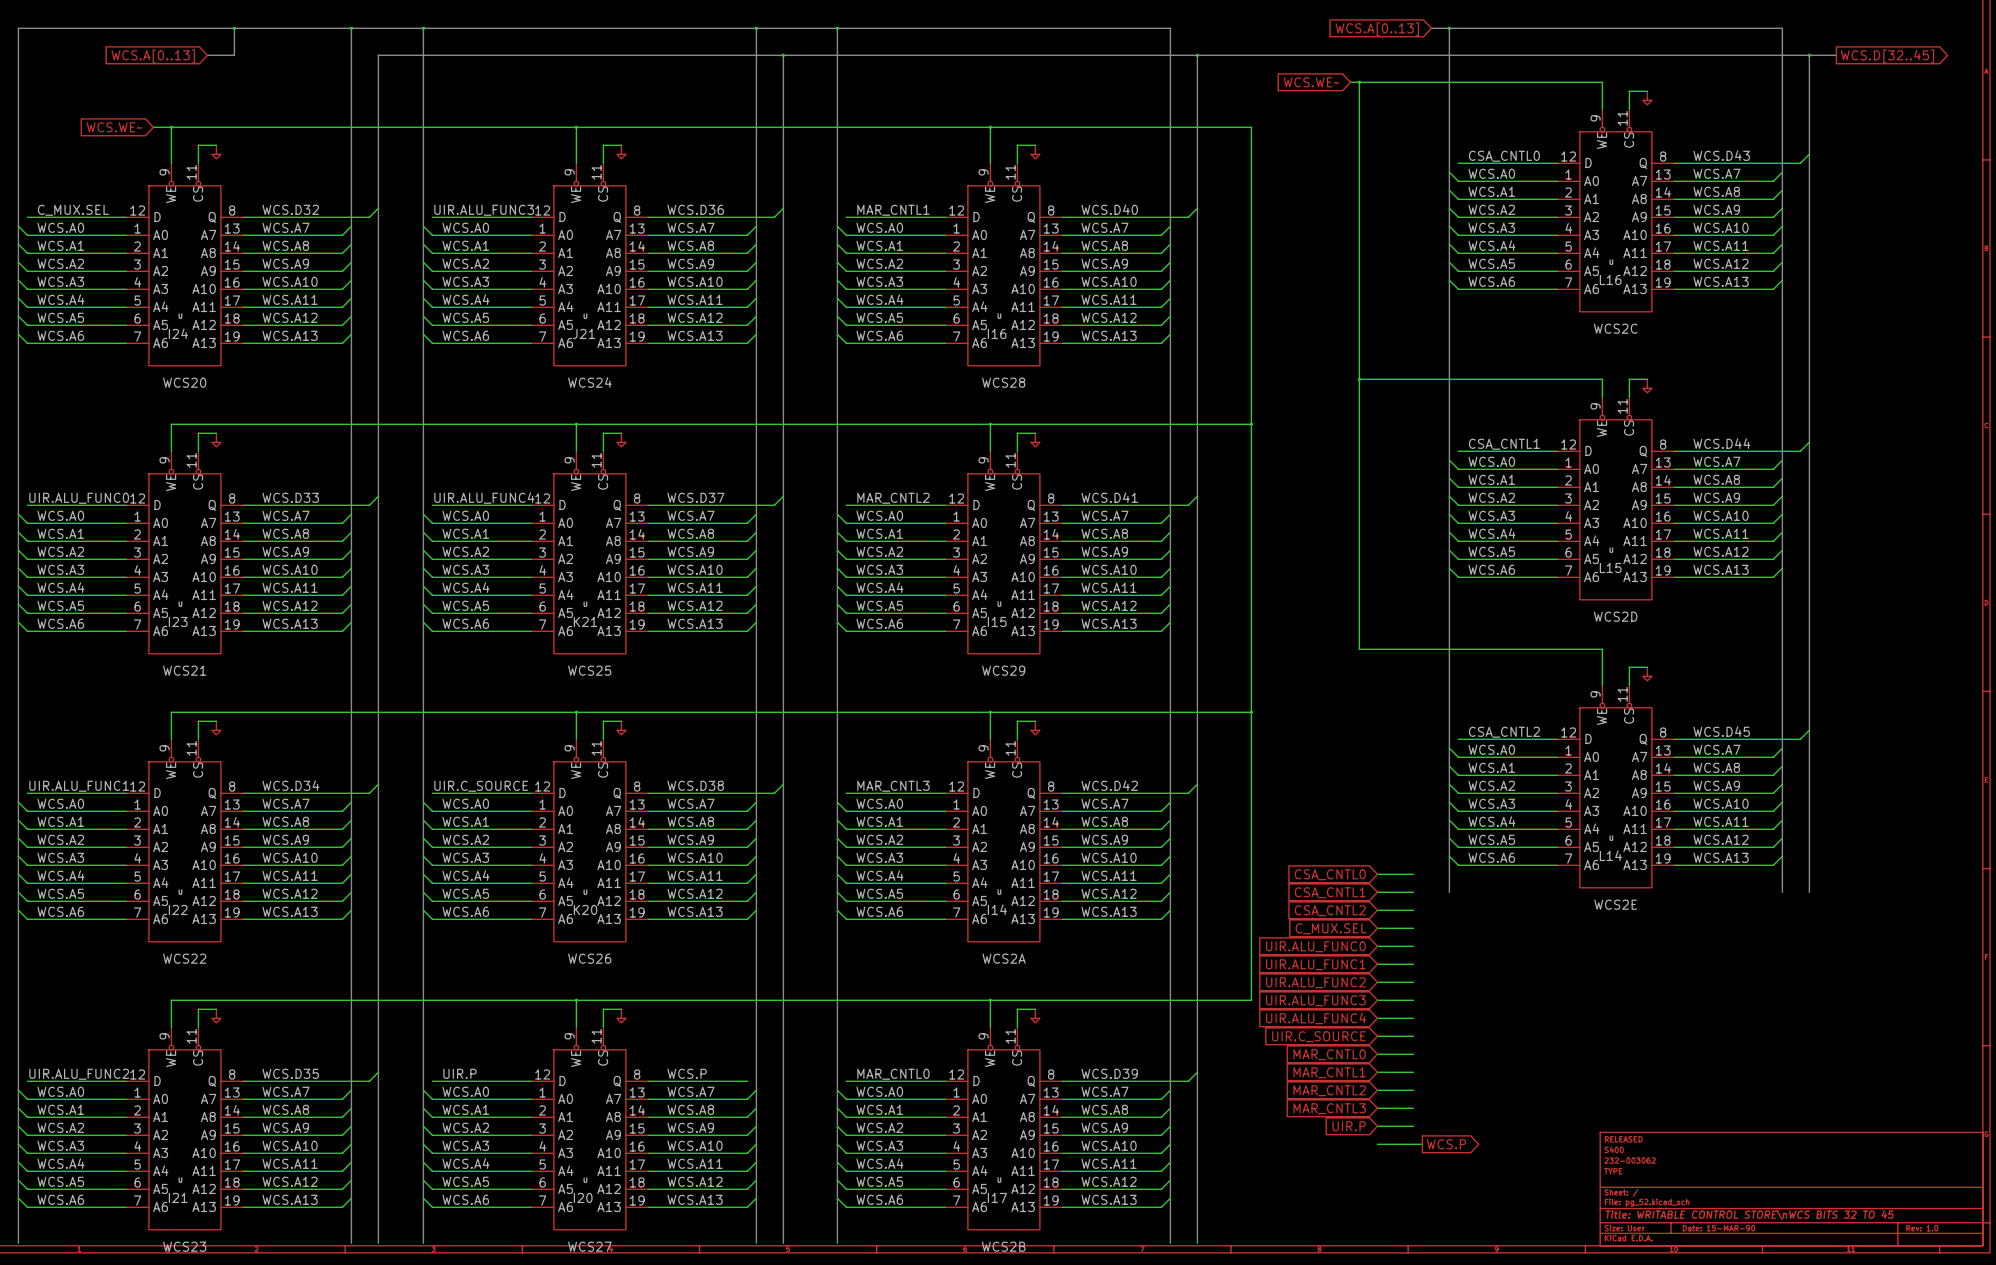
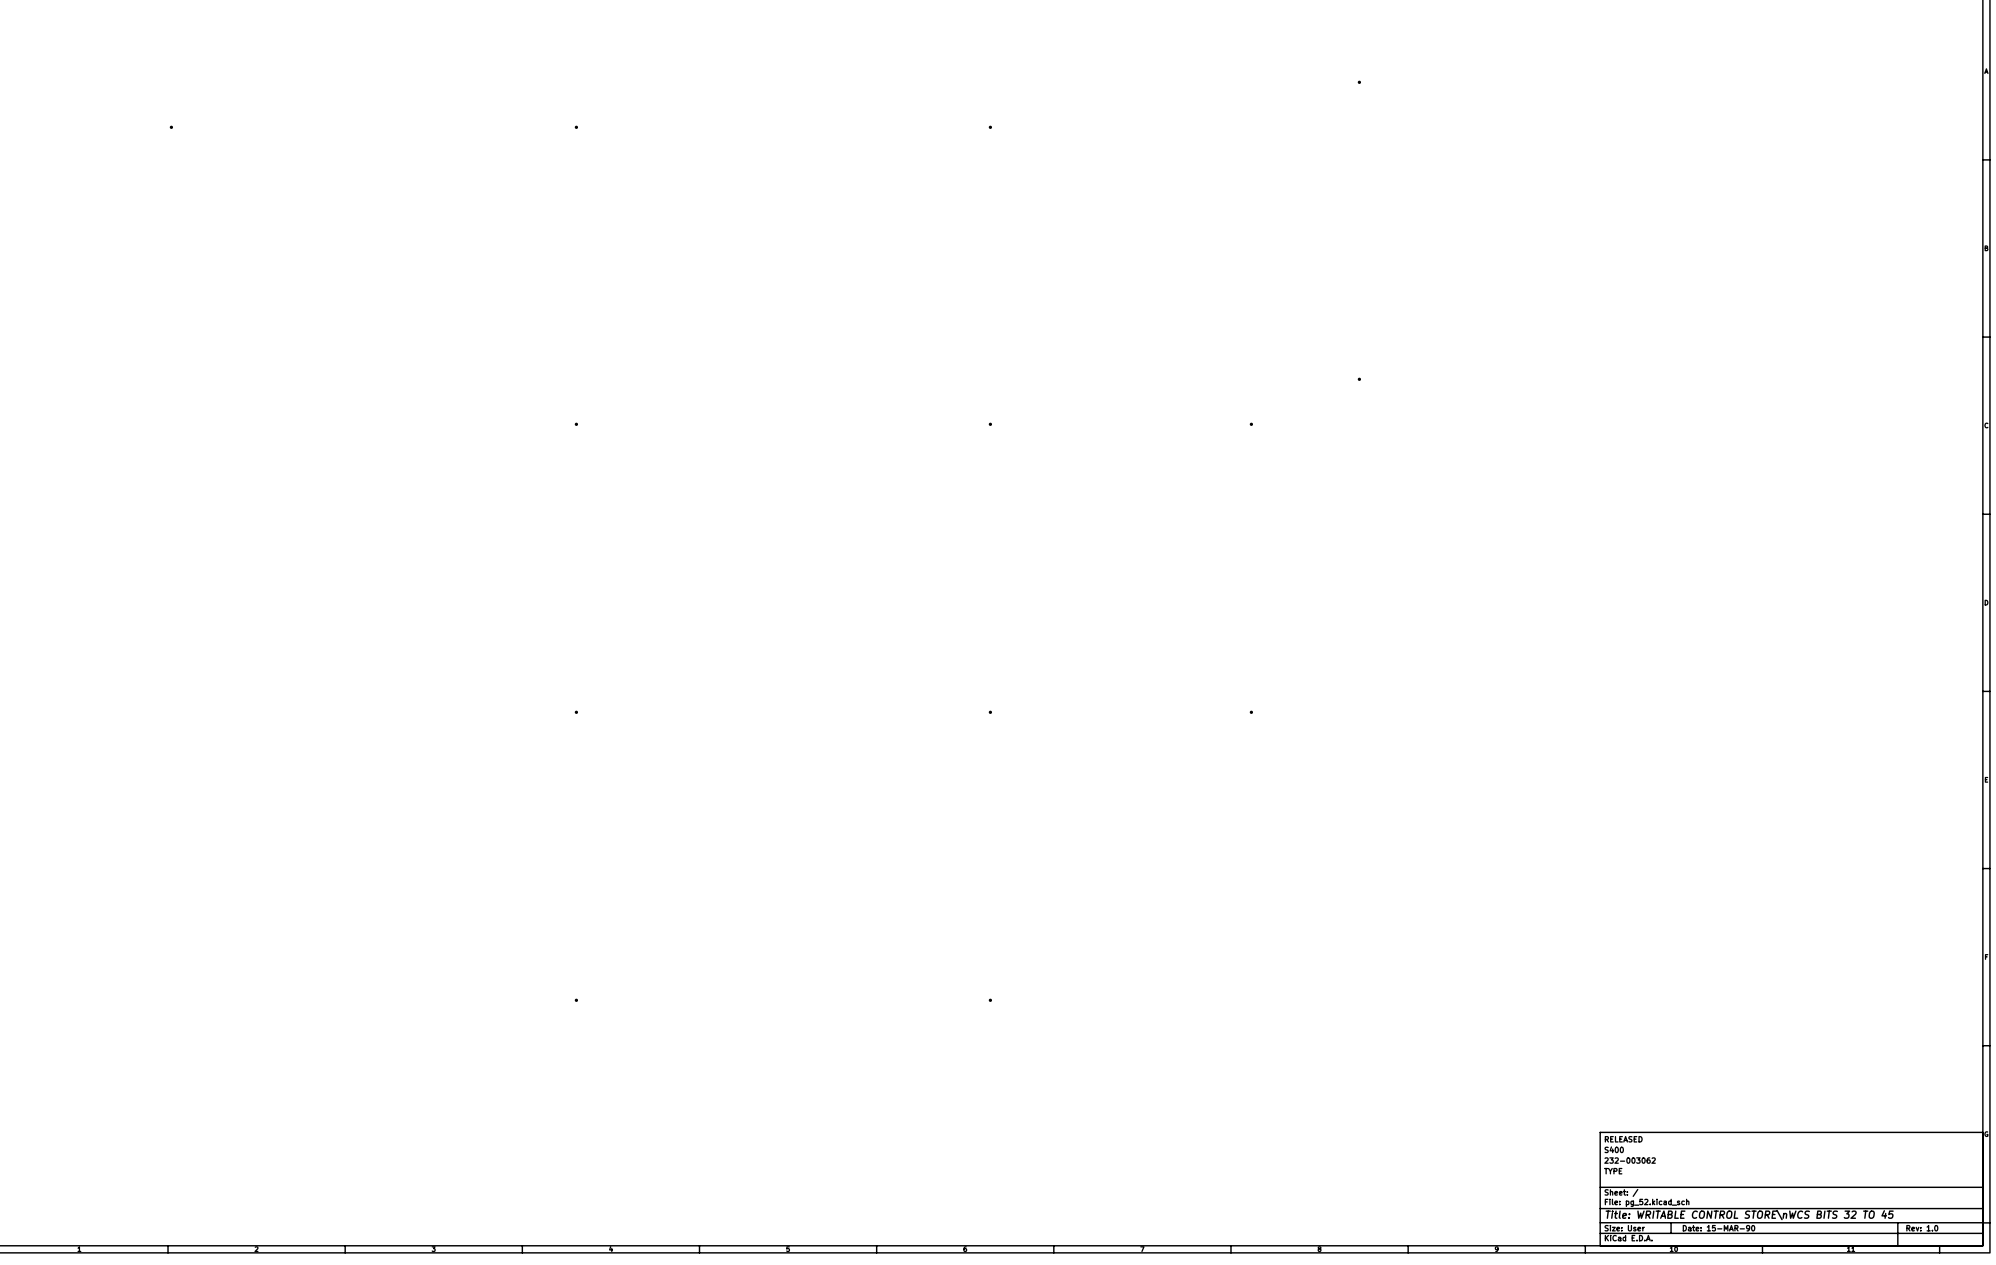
bus: (234, 28) (234, 55) (207, 55) -> none
junction: (234, 28) -> none
bus: (351, 28) (351, 1243) -> none
junction: (351, 28) -> none
bus: (423, 28) (423, 1243) -> none
junction: (423, 28) -> none
bus: (756, 28) (756, 1243) -> none
junction: (756, 28) -> none
bus: (837, 28) (837, 1243) -> none
junction: (837, 28) -> none
bus: (1431, 28) (1782, 28) (1782, 892) -> none
bus: (1449, 28) (1449, 892) -> none
junction: (1449, 28) -> none
global label: WCS.A[0..13] (1377, 29) -> none
bus: (783, 55) (783, 1243) -> none
junction: (783, 55) -> none
bus: (1197, 55) (1197, 1243) -> none
junction: (1197, 55) -> none
bus: (1809, 55) (1809, 892) -> none
junction: (1809, 55) -> none
bus: (1836, 55) (378, 55) (378, 1243) -> none
global label: WCS.A[0..13] (153, 56) -> none
global label: WCS.D[32..45] (1887, 56) -> none
global label: WCS.WE~ (1311, 82) -> none
wire: (1350, 82) (1602, 82) (1602, 109) -> none
wire: (1359, 82) (1359, 649) (1602, 649) (1602, 685) -> none
wire: (1647, 91) (1629, 91) (1629, 109) -> none
power symbol: (1647, 98) -> none
global label: WCS.WE~ (114, 127) -> none
wire: (153, 127) (1251, 127) (1251, 1000) (171, 1000) (171, 1027) -> none
wire: (171, 127) (171, 163) -> none
wire: (576, 127) (576, 163) -> none
wire: (990, 127) (990, 163) -> none
wire: (216, 145) (198, 145) (198, 163) -> none
wire: (621, 145) (603, 145) (603, 163) -> none
wire: (1035, 145) (1017, 145) (1017, 163) -> none
power symbol: (216, 152) -> none
power symbol: (621, 152) -> none
power symbol: (1035, 152) -> none
wire: (1809, 154) (1800, 163) (1674, 163) -> none
label: WCS.D43 (1721, 155) -> none
label: CSA_CNTL0 (1504, 156) -> none
wire: (1458, 163) (1557, 163) -> none
wire: (1449, 172) (1458, 181) (1557, 181) -> none
wire: (1782, 172) (1773, 181) (1674, 181) -> none
label: WCS.A0 (1491, 173) -> none
label: WCS.A7 (1716, 173) -> none
wire: (1449, 190) (1458, 199) (1557, 199) -> none
wire: (1782, 190) (1773, 199) (1674, 199) -> none
label: WCS.A1 (1491, 191) -> none
label: WCS.A8 (1716, 191) -> none
wire: (378, 208) (369, 217) (243, 217) -> none
wire: (783, 208) (774, 217) (648, 217) -> none
wire: (1197, 208) (1188, 217) (1062, 217) -> none
wire: (1449, 208) (1458, 217) (1557, 217) -> none
wire: (1782, 208) (1773, 217) (1674, 217) -> none
label: WCS.D32 (290, 209) -> none
label: WCS.D36 (695, 209) -> none
label: WCS.D40 (1109, 209) -> none
label: WCS.A2 (1491, 209) -> none
label: WCS.A9 (1716, 209) -> none
label: C_MUX.SEL (73, 210) -> none
label: UIR.ALU_FUNC3 (484, 210) -> none
label: MAR_CNTL1 (893, 210) -> none
part: (1615, 210) -> none
wire: (27, 217) (126, 217) -> none
wire: (432, 217) (531, 217) -> none
wire: (846, 217) (945, 217) -> none
wire: (18, 226) (27, 235) (126, 235) -> none
wire: (351, 226) (342, 235) (243, 235) -> none
wire: (423, 226) (432, 235) (531, 235) -> none
wire: (756, 226) (747, 235) (648, 235) -> none
wire: (837, 226) (846, 235) (945, 235) -> none
wire: (1170, 226) (1161, 235) (1062, 235) -> none
wire: (1449, 226) (1458, 235) (1557, 235) -> none
wire: (1782, 226) (1773, 235) (1674, 235) -> none
label: WCS.A0 (60, 227) -> none
label: WCS.A7 (285, 227) -> none
label: WCS.A0 (465, 227) -> none
label: WCS.A7 (690, 227) -> none
label: WCS.A0 (879, 227) -> none
label: WCS.A7 (1104, 227) -> none
label: WCS.A3 (1491, 227) -> none
label: WCS.A10 (1721, 227) -> none
wire: (18, 244) (27, 253) (126, 253) -> none
wire: (351, 244) (342, 253) (243, 253) -> none
wire: (423, 244) (432, 253) (531, 253) -> none
wire: (756, 244) (747, 253) (648, 253) -> none
wire: (837, 244) (846, 253) (945, 253) -> none
wire: (1170, 244) (1161, 253) (1062, 253) -> none
wire: (1449, 244) (1458, 253) (1557, 253) -> none
wire: (1782, 244) (1773, 253) (1674, 253) -> none
label: WCS.A1 (60, 245) -> none
label: WCS.A8 (285, 245) -> none
label: WCS.A1 (465, 245) -> none
label: WCS.A8 (690, 245) -> none
label: WCS.A1 (879, 245) -> none
label: WCS.A8 (1104, 245) -> none
label: WCS.A4 (1491, 245) -> none
label: WCS.A11 (1721, 245) -> none
wire: (18, 262) (27, 271) (126, 271) -> none
wire: (351, 262) (342, 271) (243, 271) -> none
wire: (423, 262) (432, 271) (531, 271) -> none
wire: (756, 262) (747, 271) (648, 271) -> none
wire: (837, 262) (846, 271) (945, 271) -> none
wire: (1170, 262) (1161, 271) (1062, 271) -> none
wire: (1449, 262) (1458, 271) (1557, 271) -> none
wire: (1782, 262) (1773, 271) (1674, 271) -> none
label: WCS.A2 (60, 263) -> none
label: WCS.A9 (285, 263) -> none
label: WCS.A2 (465, 263) -> none
label: WCS.A9 (690, 263) -> none
label: WCS.A2 (879, 263) -> none
label: WCS.A9 (1104, 263) -> none
label: WCS.A5 (1491, 263) -> none
label: WCS.A12 (1721, 263) -> none
part: (184, 264) -> none
part: (589, 264) -> none
part: (1003, 264) -> none
wire: (18, 280) (27, 289) (126, 289) -> none
wire: (351, 280) (342, 289) (243, 289) -> none
wire: (423, 280) (432, 289) (531, 289) -> none
wire: (756, 280) (747, 289) (648, 289) -> none
wire: (837, 280) (846, 289) (945, 289) -> none
wire: (1170, 280) (1161, 289) (1062, 289) -> none
wire: (1449, 280) (1458, 289) (1557, 289) -> none
wire: (1782, 280) (1773, 289) (1674, 289) -> none
label: WCS.A3 (60, 281) -> none
label: WCS.A10 (290, 281) -> none
label: WCS.A3 (465, 281) -> none
label: WCS.A10 (695, 281) -> none
label: WCS.A3 (879, 281) -> none
label: WCS.A10 (1109, 281) -> none
label: WCS.A6 (1491, 281) -> none
label: WCS.A13 (1721, 281) -> none
wire: (18, 298) (27, 307) (126, 307) -> none
wire: (351, 298) (342, 307) (243, 307) -> none
wire: (423, 298) (432, 307) (531, 307) -> none
wire: (756, 298) (747, 307) (648, 307) -> none
wire: (837, 298) (846, 307) (945, 307) -> none
wire: (1170, 298) (1161, 307) (1062, 307) -> none
label: WCS.A4 (60, 299) -> none
label: WCS.A11 (290, 299) -> none
label: WCS.A4 (465, 299) -> none
label: WCS.A11 (695, 299) -> none
label: WCS.A4 (879, 299) -> none
label: WCS.A11 (1109, 299) -> none
wire: (18, 316) (27, 325) (126, 325) -> none
wire: (351, 316) (342, 325) (243, 325) -> none
wire: (423, 316) (432, 325) (531, 325) -> none
wire: (756, 316) (747, 325) (648, 325) -> none
wire: (837, 316) (846, 325) (945, 325) -> none
wire: (1170, 316) (1161, 325) (1062, 325) -> none
label: WCS.A5 (60, 317) -> none
label: WCS.A12 (290, 317) -> none
label: WCS.A5 (465, 317) -> none
label: WCS.A12 (695, 317) -> none
label: WCS.A5 (879, 317) -> none
label: WCS.A12 (1109, 317) -> none
wire: (18, 334) (27, 343) (126, 343) -> none
wire: (351, 334) (342, 343) (243, 343) -> none
wire: (423, 334) (432, 343) (531, 343) -> none
wire: (756, 334) (747, 343) (648, 343) -> none
wire: (837, 334) (846, 343) (945, 343) -> none
wire: (1170, 334) (1161, 343) (1062, 343) -> none
label: WCS.A6 (60, 335) -> none
label: WCS.A13 (290, 335) -> none
label: WCS.A6 (465, 335) -> none
label: WCS.A13 (695, 335) -> none
label: WCS.A6 (879, 335) -> none
label: WCS.A13 (1109, 335) -> none
wire: (1359, 379) (1602, 379) (1602, 397) -> none
wire: (1647, 379) (1629, 379) (1629, 397) -> none
power symbol: (1647, 386) -> none
wire: (576, 424) (576, 451) -> none
wire: (990, 424) (990, 451) -> none
wire: (1251, 424) (171, 424) (171, 451) -> none
wire: (216, 433) (198, 433) (198, 451) -> none
wire: (621, 433) (603, 433) (603, 451) -> none
wire: (1035, 433) (1017, 433) (1017, 451) -> none
power symbol: (216, 440) -> none
power symbol: (621, 440) -> none
power symbol: (1035, 440) -> none
wire: (1809, 442) (1800, 451) (1674, 451) -> none
label: WCS.D44 (1721, 443) -> none
label: CSA_CNTL1 (1504, 444) -> none
wire: (1458, 451) (1557, 451) -> none
wire: (1449, 460) (1458, 469) (1557, 469) -> none
wire: (1782, 460) (1773, 469) (1674, 469) -> none
label: WCS.A0 (1491, 461) -> none
label: WCS.A7 (1716, 461) -> none
wire: (1449, 478) (1458, 487) (1557, 487) -> none
wire: (1782, 478) (1773, 487) (1674, 487) -> none
label: WCS.A1 (1491, 479) -> none
label: WCS.A8 (1716, 479) -> none
wire: (378, 496) (369, 505) (243, 505) -> none
wire: (783, 496) (774, 505) (648, 505) -> none
wire: (1197, 496) (1188, 505) (1062, 505) -> none
wire: (1449, 496) (1458, 505) (1557, 505) -> none
wire: (1782, 496) (1773, 505) (1674, 505) -> none
label: WCS.D33 (290, 497) -> none
label: WCS.D37 (695, 497) -> none
label: WCS.D41 (1109, 497) -> none
label: WCS.A2 (1491, 497) -> none
label: WCS.A9 (1716, 497) -> none
label: UIR.ALU_FUNC0 (79, 498) -> none
label: UIR.ALU_FUNC4 (484, 498) -> none
label: MAR_CNTL2 (893, 498) -> none
part: (1615, 498) -> none
wire: (27, 505) (126, 505) -> none
wire: (432, 505) (531, 505) -> none
wire: (846, 505) (945, 505) -> none
wire: (18, 514) (27, 523) (126, 523) -> none
wire: (351, 514) (342, 523) (243, 523) -> none
wire: (423, 514) (432, 523) (531, 523) -> none
wire: (756, 514) (747, 523) (648, 523) -> none
wire: (837, 514) (846, 523) (945, 523) -> none
wire: (1170, 514) (1161, 523) (1062, 523) -> none
wire: (1449, 514) (1458, 523) (1557, 523) -> none
wire: (1782, 514) (1773, 523) (1674, 523) -> none
label: WCS.A0 (60, 515) -> none
label: WCS.A7 (285, 515) -> none
label: WCS.A0 (465, 515) -> none
label: WCS.A7 (690, 515) -> none
label: WCS.A0 (879, 515) -> none
label: WCS.A7 (1104, 515) -> none
label: WCS.A3 (1491, 515) -> none
label: WCS.A10 (1721, 515) -> none
wire: (18, 532) (27, 541) (126, 541) -> none
wire: (351, 532) (342, 541) (243, 541) -> none
wire: (423, 532) (432, 541) (531, 541) -> none
wire: (756, 532) (747, 541) (648, 541) -> none
wire: (837, 532) (846, 541) (945, 541) -> none
wire: (1170, 532) (1161, 541) (1062, 541) -> none
wire: (1449, 532) (1458, 541) (1557, 541) -> none
wire: (1782, 532) (1773, 541) (1674, 541) -> none
label: WCS.A1 (60, 533) -> none
label: WCS.A8 (285, 533) -> none
label: WCS.A1 (465, 533) -> none
label: WCS.A8 (690, 533) -> none
label: WCS.A1 (879, 533) -> none
label: WCS.A8 (1104, 533) -> none
label: WCS.A4 (1491, 533) -> none
label: WCS.A11 (1721, 533) -> none
wire: (18, 550) (27, 559) (126, 559) -> none
wire: (351, 550) (342, 559) (243, 559) -> none
wire: (423, 550) (432, 559) (531, 559) -> none
wire: (756, 550) (747, 559) (648, 559) -> none
wire: (837, 550) (846, 559) (945, 559) -> none
wire: (1170, 550) (1161, 559) (1062, 559) -> none
wire: (1449, 550) (1458, 559) (1557, 559) -> none
wire: (1782, 550) (1773, 559) (1674, 559) -> none
label: WCS.A2 (60, 551) -> none
label: WCS.A9 (285, 551) -> none
label: WCS.A2 (465, 551) -> none
label: WCS.A9 (690, 551) -> none
label: WCS.A2 (879, 551) -> none
label: WCS.A9 (1104, 551) -> none
label: WCS.A5 (1491, 551) -> none
label: WCS.A12 (1721, 551) -> none
part: (184, 552) -> none
part: (589, 552) -> none
part: (1003, 552) -> none
wire: (18, 568) (27, 577) (126, 577) -> none
wire: (351, 568) (342, 577) (243, 577) -> none
wire: (423, 568) (432, 577) (531, 577) -> none
wire: (756, 568) (747, 577) (648, 577) -> none
wire: (837, 568) (846, 577) (945, 577) -> none
wire: (1170, 568) (1161, 577) (1062, 577) -> none
wire: (1449, 568) (1458, 577) (1557, 577) -> none
wire: (1782, 568) (1773, 577) (1674, 577) -> none
label: WCS.A3 (60, 569) -> none
label: WCS.A10 (290, 569) -> none
label: WCS.A3 (465, 569) -> none
label: WCS.A10 (695, 569) -> none
label: WCS.A3 (879, 569) -> none
label: WCS.A10 (1109, 569) -> none
label: WCS.A6 (1491, 569) -> none
label: WCS.A13 (1721, 569) -> none
wire: (18, 586) (27, 595) (126, 595) -> none
wire: (351, 586) (342, 595) (243, 595) -> none
wire: (423, 586) (432, 595) (531, 595) -> none
wire: (756, 586) (747, 595) (648, 595) -> none
wire: (837, 586) (846, 595) (945, 595) -> none
wire: (1170, 586) (1161, 595) (1062, 595) -> none
label: WCS.A4 (60, 587) -> none
label: WCS.A11 (290, 587) -> none
label: WCS.A4 (465, 587) -> none
label: WCS.A11 (695, 587) -> none
label: WCS.A4 (879, 587) -> none
label: WCS.A11 (1109, 587) -> none
wire: (18, 604) (27, 613) (126, 613) -> none
wire: (351, 604) (342, 613) (243, 613) -> none
wire: (423, 604) (432, 613) (531, 613) -> none
wire: (756, 604) (747, 613) (648, 613) -> none
wire: (837, 604) (846, 613) (945, 613) -> none
wire: (1170, 604) (1161, 613) (1062, 613) -> none
label: WCS.A5 (60, 605) -> none
label: WCS.A12 (290, 605) -> none
label: WCS.A5 (465, 605) -> none
label: WCS.A12 (695, 605) -> none
label: WCS.A5 (879, 605) -> none
label: WCS.A12 (1109, 605) -> none
wire: (18, 622) (27, 631) (126, 631) -> none
wire: (351, 622) (342, 631) (243, 631) -> none
wire: (423, 622) (432, 631) (531, 631) -> none
wire: (756, 622) (747, 631) (648, 631) -> none
wire: (837, 622) (846, 631) (945, 631) -> none
wire: (1170, 622) (1161, 631) (1062, 631) -> none
label: WCS.A6 (60, 623) -> none
label: WCS.A13 (290, 623) -> none
label: WCS.A6 (465, 623) -> none
label: WCS.A13 (695, 623) -> none
label: WCS.A6 (879, 623) -> none
label: WCS.A13 (1109, 623) -> none
wire: (1647, 667) (1629, 667) (1629, 685) -> none
power symbol: (1647, 674) -> none
wire: (576, 712) (576, 739) -> none
wire: (990, 712) (990, 739) -> none
wire: (1251, 712) (171, 712) (171, 739) -> none
wire: (216, 721) (198, 721) (198, 739) -> none
wire: (621, 721) (603, 721) (603, 739) -> none
wire: (1035, 721) (1017, 721) (1017, 739) -> none
power symbol: (216, 728) -> none
power symbol: (621, 728) -> none
power symbol: (1035, 728) -> none
wire: (1809, 730) (1800, 739) (1674, 739) -> none
label: WCS.D45 (1721, 731) -> none
label: CSA_CNTL2 (1504, 732) -> none
wire: (1458, 739) (1557, 739) -> none
wire: (1449, 748) (1458, 757) (1557, 757) -> none
wire: (1782, 748) (1773, 757) (1674, 757) -> none
label: WCS.A0 (1491, 749) -> none
label: WCS.A7 (1716, 749) -> none
wire: (1449, 766) (1458, 775) (1557, 775) -> none
wire: (1782, 766) (1773, 775) (1674, 775) -> none
label: WCS.A1 (1491, 767) -> none
label: WCS.A8 (1716, 767) -> none
wire: (378, 784) (369, 793) (243, 793) -> none
wire: (783, 784) (774, 793) (648, 793) -> none
wire: (1197, 784) (1188, 793) (1062, 793) -> none
wire: (1449, 784) (1458, 793) (1557, 793) -> none
wire: (1782, 784) (1773, 793) (1674, 793) -> none
label: WCS.D34 (290, 785) -> none
label: WCS.D38 (695, 785) -> none
label: WCS.D42 (1109, 785) -> none
label: WCS.A2 (1491, 785) -> none
label: WCS.A9 (1716, 785) -> none
label: UIR.ALU_FUNC1 (79, 786) -> none
label: UIR.C_SOURCE (481, 786) -> none
label: MAR_CNTL3 (893, 786) -> none
part: (1615, 786) -> none
wire: (27, 793) (126, 793) -> none
wire: (432, 793) (531, 793) -> none
wire: (846, 793) (945, 793) -> none
wire: (18, 802) (27, 811) (126, 811) -> none
wire: (351, 802) (342, 811) (243, 811) -> none
wire: (423, 802) (432, 811) (531, 811) -> none
wire: (756, 802) (747, 811) (648, 811) -> none
wire: (837, 802) (846, 811) (945, 811) -> none
wire: (1170, 802) (1161, 811) (1062, 811) -> none
wire: (1449, 802) (1458, 811) (1557, 811) -> none
wire: (1782, 802) (1773, 811) (1674, 811) -> none
label: WCS.A0 (60, 803) -> none
label: WCS.A7 (285, 803) -> none
label: WCS.A0 (465, 803) -> none
label: WCS.A7 (690, 803) -> none
label: WCS.A0 (879, 803) -> none
label: WCS.A7 (1104, 803) -> none
label: WCS.A3 (1491, 803) -> none
label: WCS.A10 (1721, 803) -> none
wire: (18, 820) (27, 829) (126, 829) -> none
wire: (351, 820) (342, 829) (243, 829) -> none
wire: (423, 820) (432, 829) (531, 829) -> none
wire: (756, 820) (747, 829) (648, 829) -> none
wire: (837, 820) (846, 829) (945, 829) -> none
wire: (1170, 820) (1161, 829) (1062, 829) -> none
wire: (1449, 820) (1458, 829) (1557, 829) -> none
wire: (1782, 820) (1773, 829) (1674, 829) -> none
label: WCS.A1 (60, 821) -> none
label: WCS.A8 (285, 821) -> none
label: WCS.A1 (465, 821) -> none
label: WCS.A8 (690, 821) -> none
label: WCS.A1 (879, 821) -> none
label: WCS.A8 (1104, 821) -> none
label: WCS.A4 (1491, 821) -> none
label: WCS.A11 (1721, 821) -> none
wire: (18, 838) (27, 847) (126, 847) -> none
wire: (351, 838) (342, 847) (243, 847) -> none
wire: (423, 838) (432, 847) (531, 847) -> none
wire: (756, 838) (747, 847) (648, 847) -> none
wire: (837, 838) (846, 847) (945, 847) -> none
wire: (1170, 838) (1161, 847) (1062, 847) -> none
wire: (1449, 838) (1458, 847) (1557, 847) -> none
wire: (1782, 838) (1773, 847) (1674, 847) -> none
label: WCS.A2 (60, 839) -> none
label: WCS.A9 (285, 839) -> none
label: WCS.A2 (465, 839) -> none
label: WCS.A9 (690, 839) -> none
label: WCS.A2 (879, 839) -> none
label: WCS.A9 (1104, 839) -> none
label: WCS.A5 (1491, 839) -> none
label: WCS.A12 (1721, 839) -> none
part: (184, 840) -> none
part: (589, 840) -> none
part: (1003, 840) -> none
wire: (18, 856) (27, 865) (126, 865) -> none
wire: (351, 856) (342, 865) (243, 865) -> none
wire: (423, 856) (432, 865) (531, 865) -> none
wire: (756, 856) (747, 865) (648, 865) -> none
wire: (837, 856) (846, 865) (945, 865) -> none
wire: (1170, 856) (1161, 865) (1062, 865) -> none
wire: (1449, 856) (1458, 865) (1557, 865) -> none
wire: (1782, 856) (1773, 865) (1674, 865) -> none
label: WCS.A3 (60, 857) -> none
label: WCS.A10 (290, 857) -> none
label: WCS.A3 (465, 857) -> none
label: WCS.A10 (695, 857) -> none
label: WCS.A3 (879, 857) -> none
label: WCS.A10 (1109, 857) -> none
label: WCS.A6 (1491, 857) -> none
label: WCS.A13 (1721, 857) -> none
wire: (18, 874) (27, 883) (126, 883) -> none
wire: (351, 874) (342, 883) (243, 883) -> none
wire: (423, 874) (432, 883) (531, 883) -> none
wire: (756, 874) (747, 883) (648, 883) -> none
wire: (837, 874) (846, 883) (945, 883) -> none
wire: (1170, 874) (1161, 883) (1062, 883) -> none
global label: CSA_CNTL0 (1330, 874) -> none
wire: (1377, 874) (1413, 874) -> none
label: WCS.A4 (60, 875) -> none
label: WCS.A11 (290, 875) -> none
label: WCS.A4 (465, 875) -> none
label: WCS.A11 (695, 875) -> none
label: WCS.A4 (879, 875) -> none
label: WCS.A11 (1109, 875) -> none
wire: (18, 892) (27, 901) (126, 901) -> none
wire: (351, 892) (342, 901) (243, 901) -> none
wire: (423, 892) (432, 901) (531, 901) -> none
wire: (756, 892) (747, 901) (648, 901) -> none
wire: (837, 892) (846, 901) (945, 901) -> none
wire: (1170, 892) (1161, 901) (1062, 901) -> none
global label: CSA_CNTL1 (1330, 892) -> none
wire: (1377, 892) (1413, 892) -> none
label: WCS.A5 (60, 893) -> none
label: WCS.A12 (290, 893) -> none
label: WCS.A5 (465, 893) -> none
label: WCS.A12 (695, 893) -> none
label: WCS.A5 (879, 893) -> none
label: WCS.A12 (1109, 893) -> none
wire: (18, 910) (27, 919) (126, 919) -> none
wire: (351, 910) (342, 919) (243, 919) -> none
wire: (423, 910) (432, 919) (531, 919) -> none
wire: (756, 910) (747, 919) (648, 919) -> none
wire: (837, 910) (846, 919) (945, 919) -> none
wire: (1170, 910) (1161, 919) (1062, 919) -> none
global label: CSA_CNTL2 (1330, 910) -> none
wire: (1377, 910) (1413, 910) -> none
label: WCS.A6 (60, 911) -> none
label: WCS.A13 (290, 911) -> none
label: WCS.A6 (465, 911) -> none
label: WCS.A13 (695, 911) -> none
label: WCS.A6 (879, 911) -> none
label: WCS.A13 (1109, 911) -> none
global label: C_MUX.SEL (1331, 928) -> none
wire: (1377, 928) (1413, 928) -> none
global label: UIR.ALU_FUNC0 (1315, 946) -> none
wire: (1377, 946) (1413, 946) -> none
global label: UIR.ALU_FUNC1 (1315, 964) -> none
wire: (1377, 964) (1413, 964) -> none
global label: UIR.ALU_FUNC2 (1315, 982) -> none
wire: (1377, 982) (1413, 982) -> none
wire: (576, 1000) (576, 1027) -> none
wire: (990, 1000) (990, 1027) -> none
global label: UIR.ALU_FUNC3 (1315, 1000) -> none
wire: (1377, 1000) (1413, 1000) -> none
wire: (216, 1009) (198, 1009) (198, 1027) -> none
wire: (621, 1009) (603, 1009) (603, 1027) -> none
wire: (1035, 1009) (1017, 1009) (1017, 1027) -> none
power symbol: (216, 1016) -> none
power symbol: (621, 1016) -> none
power symbol: (1035, 1016) -> none
global label: UIR.ALU_FUNC4 (1316, 1018) -> none
wire: (1377, 1018) (1413, 1018) -> none
global label: UIR.C_SOURCE (1318, 1036) -> none
wire: (1377, 1036) (1413, 1036) -> none
global label: MAR_CNTL0 (1329, 1054) -> none
wire: (1377, 1054) (1413, 1054) -> none
wire: (378, 1072) (369, 1081) (243, 1081) -> none
wire: (1197, 1072) (1188, 1081) (1062, 1081) -> none
global label: MAR_CNTL1 (1329, 1072) -> none
wire: (1377, 1072) (1413, 1072) -> none
label: WCS.D35 (290, 1073) -> none
label: UIR.P (459, 1073) -> none
label: WCS.P (687, 1073) -> none
label: WCS.D39 (1109, 1073) -> none
label: UIR.ALU_FUNC2 (79, 1074) -> none
label: MAR_CNTL0 (893, 1074) -> none
wire: (27, 1081) (126, 1081) -> none
wire: (432, 1081) (531, 1081) -> none
wire: (648, 1081) (747, 1081) -> none
wire: (846, 1081) (945, 1081) -> none
wire: (18, 1090) (27, 1099) (126, 1099) -> none
wire: (351, 1090) (342, 1099) (243, 1099) -> none
wire: (423, 1090) (432, 1099) (531, 1099) -> none
wire: (756, 1090) (747, 1099) (648, 1099) -> none
wire: (837, 1090) (846, 1099) (945, 1099) -> none
wire: (1170, 1090) (1161, 1099) (1062, 1099) -> none
global label: MAR_CNTL2 (1329, 1090) -> none
wire: (1377, 1090) (1413, 1090) -> none
label: WCS.A0 (60, 1091) -> none
label: WCS.A7 (285, 1091) -> none
label: WCS.A0 (465, 1091) -> none
label: WCS.A7 (690, 1091) -> none
label: WCS.A0 (879, 1091) -> none
label: WCS.A7 (1104, 1091) -> none
wire: (18, 1108) (27, 1117) (126, 1117) -> none
wire: (351, 1108) (342, 1117) (243, 1117) -> none
wire: (423, 1108) (432, 1117) (531, 1117) -> none
wire: (756, 1108) (747, 1117) (648, 1117) -> none
wire: (837, 1108) (846, 1117) (945, 1117) -> none
wire: (1170, 1108) (1161, 1117) (1062, 1117) -> none
global label: MAR_CNTL3 (1329, 1108) -> none
wire: (1377, 1108) (1413, 1108) -> none
label: WCS.A1 (60, 1109) -> none
label: WCS.A8 (285, 1109) -> none
label: WCS.A1 (465, 1109) -> none
label: WCS.A8 (690, 1109) -> none
label: WCS.A1 (879, 1109) -> none
label: WCS.A8 (1104, 1109) -> none
wire: (18, 1126) (27, 1135) (126, 1135) -> none
wire: (351, 1126) (342, 1135) (243, 1135) -> none
wire: (423, 1126) (432, 1135) (531, 1135) -> none
wire: (756, 1126) (747, 1135) (648, 1135) -> none
wire: (837, 1126) (846, 1135) (945, 1135) -> none
wire: (1170, 1126) (1161, 1135) (1062, 1135) -> none
global label: UIR.P (1349, 1126) -> none
wire: (1377, 1126) (1413, 1126) -> none
label: WCS.A2 (60, 1127) -> none
label: WCS.A9 (285, 1127) -> none
label: WCS.A2 (465, 1127) -> none
label: WCS.A9 (690, 1127) -> none
label: WCS.A2 (879, 1127) -> none
label: WCS.A9 (1104, 1127) -> none
part: (184, 1128) -> none
part: (589, 1128) -> none
part: (1003, 1128) -> none
wire: (18, 1144) (27, 1153) (126, 1153) -> none
wire: (351, 1144) (342, 1153) (243, 1153) -> none
wire: (423, 1144) (432, 1153) (531, 1153) -> none
wire: (756, 1144) (747, 1153) (648, 1153) -> none
wire: (837, 1144) (846, 1153) (945, 1153) -> none
wire: (1170, 1144) (1161, 1153) (1062, 1153) -> none
wire: (1377, 1144) (1422, 1144) -> none
global label: WCS.P (1446, 1144) -> none
label: WCS.A3 (60, 1145) -> none
label: WCS.A10 (290, 1145) -> none
label: WCS.A3 (465, 1145) -> none
label: WCS.A10 (695, 1145) -> none
label: WCS.A3 (879, 1145) -> none
label: WCS.A10 (1109, 1145) -> none
wire: (18, 1162) (27, 1171) (126, 1171) -> none
wire: (351, 1162) (342, 1171) (243, 1171) -> none
wire: (423, 1162) (432, 1171) (531, 1171) -> none
wire: (756, 1162) (747, 1171) (648, 1171) -> none
wire: (837, 1162) (846, 1171) (945, 1171) -> none
wire: (1170, 1162) (1161, 1171) (1062, 1171) -> none
label: WCS.A4 (60, 1163) -> none
label: WCS.A11 (290, 1163) -> none
label: WCS.A4 (465, 1163) -> none
label: WCS.A11 (695, 1163) -> none
label: WCS.A4 (879, 1163) -> none
label: WCS.A11 (1109, 1163) -> none
wire: (18, 1180) (27, 1189) (126, 1189) -> none
wire: (351, 1180) (342, 1189) (243, 1189) -> none
wire: (423, 1180) (432, 1189) (531, 1189) -> none
wire: (756, 1180) (747, 1189) (648, 1189) -> none
wire: (837, 1180) (846, 1189) (945, 1189) -> none
wire: (1170, 1180) (1161, 1189) (1062, 1189) -> none
label: WCS.A5 (60, 1181) -> none
label: WCS.A12 (290, 1181) -> none
label: WCS.A5 (465, 1181) -> none
label: WCS.A12 (695, 1181) -> none
label: WCS.A5 (879, 1181) -> none
label: WCS.A12 (1109, 1181) -> none
wire: (18, 1198) (27, 1207) (126, 1207) -> none
wire: (351, 1198) (342, 1207) (243, 1207) -> none
wire: (423, 1198) (432, 1207) (531, 1207) -> none
wire: (756, 1198) (747, 1207) (648, 1207) -> none
wire: (837, 1198) (846, 1207) (945, 1207) -> none
wire: (1170, 1198) (1161, 1207) (1062, 1207) -> none
label: WCS.A6 (60, 1199) -> none
label: WCS.A13 (290, 1199) -> none
label: WCS.A6 (465, 1199) -> none
label: WCS.A13 (695, 1199) -> none
label: WCS.A6 (879, 1199) -> none
label: WCS.A13 (1109, 1199) -> none
bus: (18, 1243) (18, 28) (1170, 28) (1170, 1243) -> none

